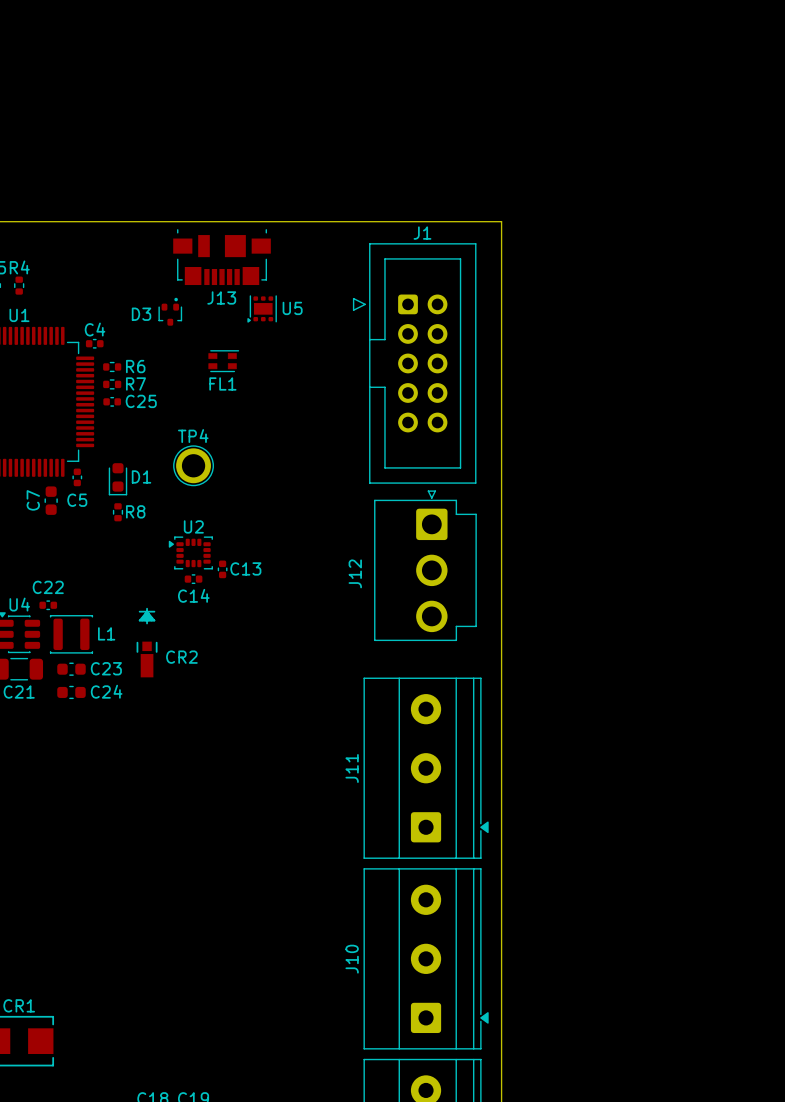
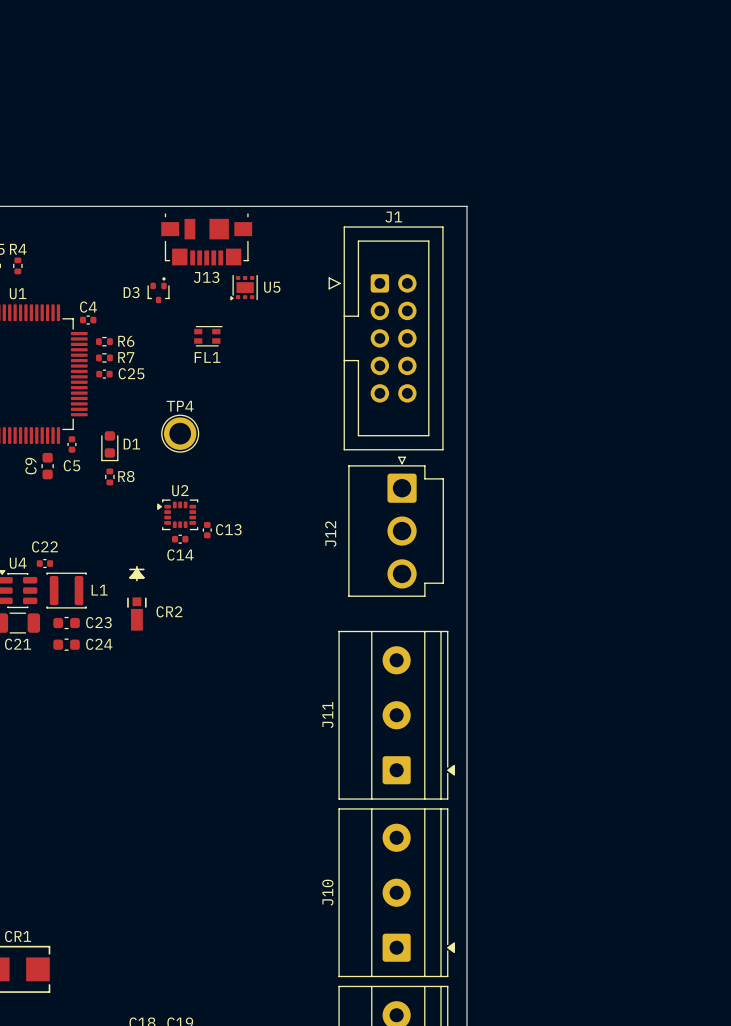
C7 name: C7 (33, 500) -> C9 (30, 466)

